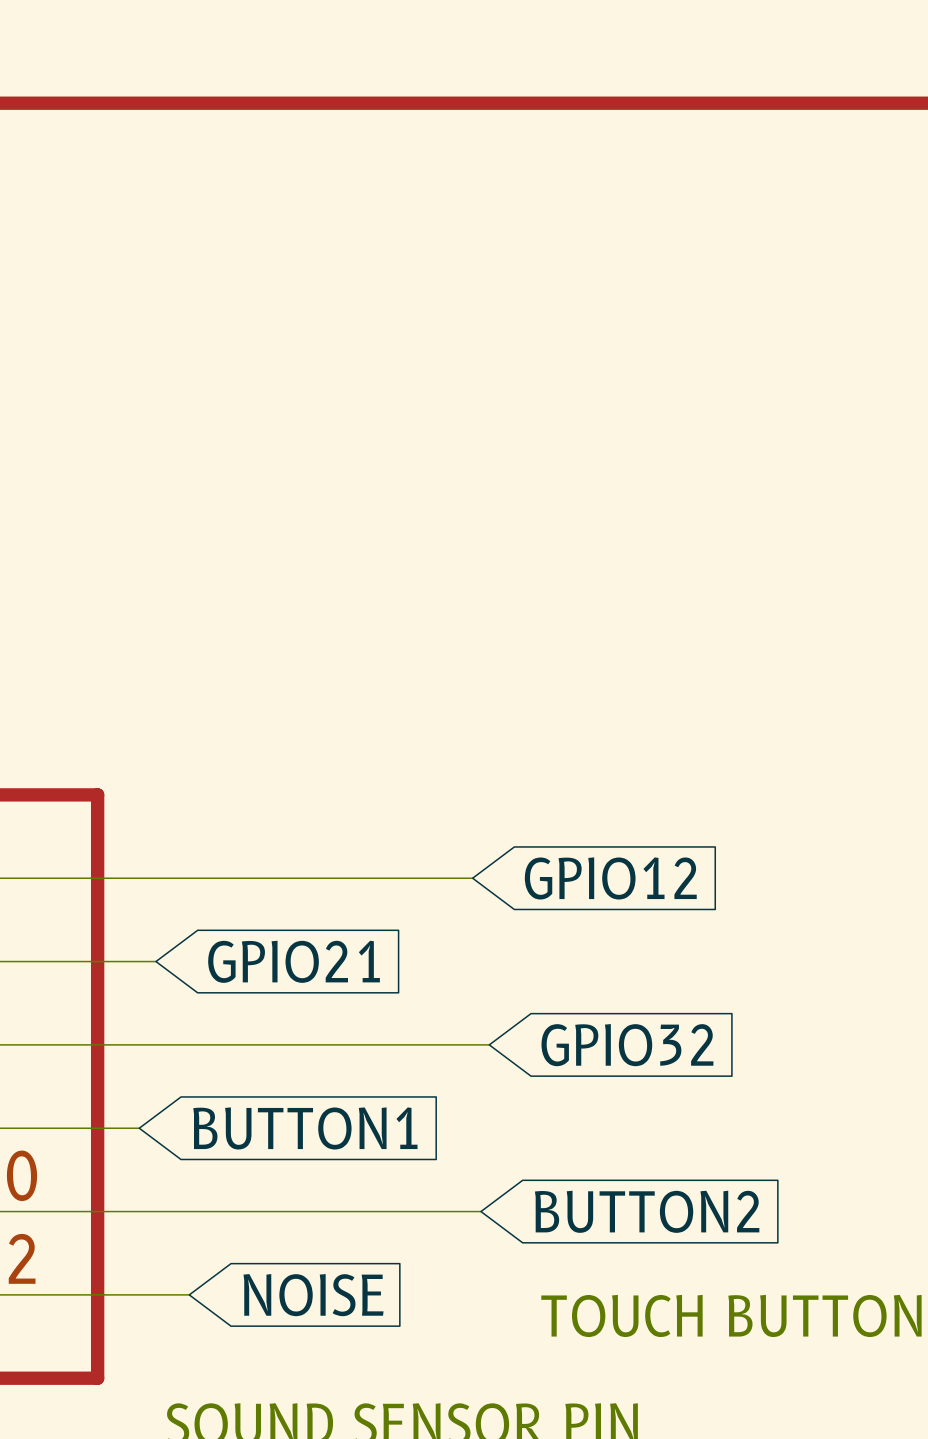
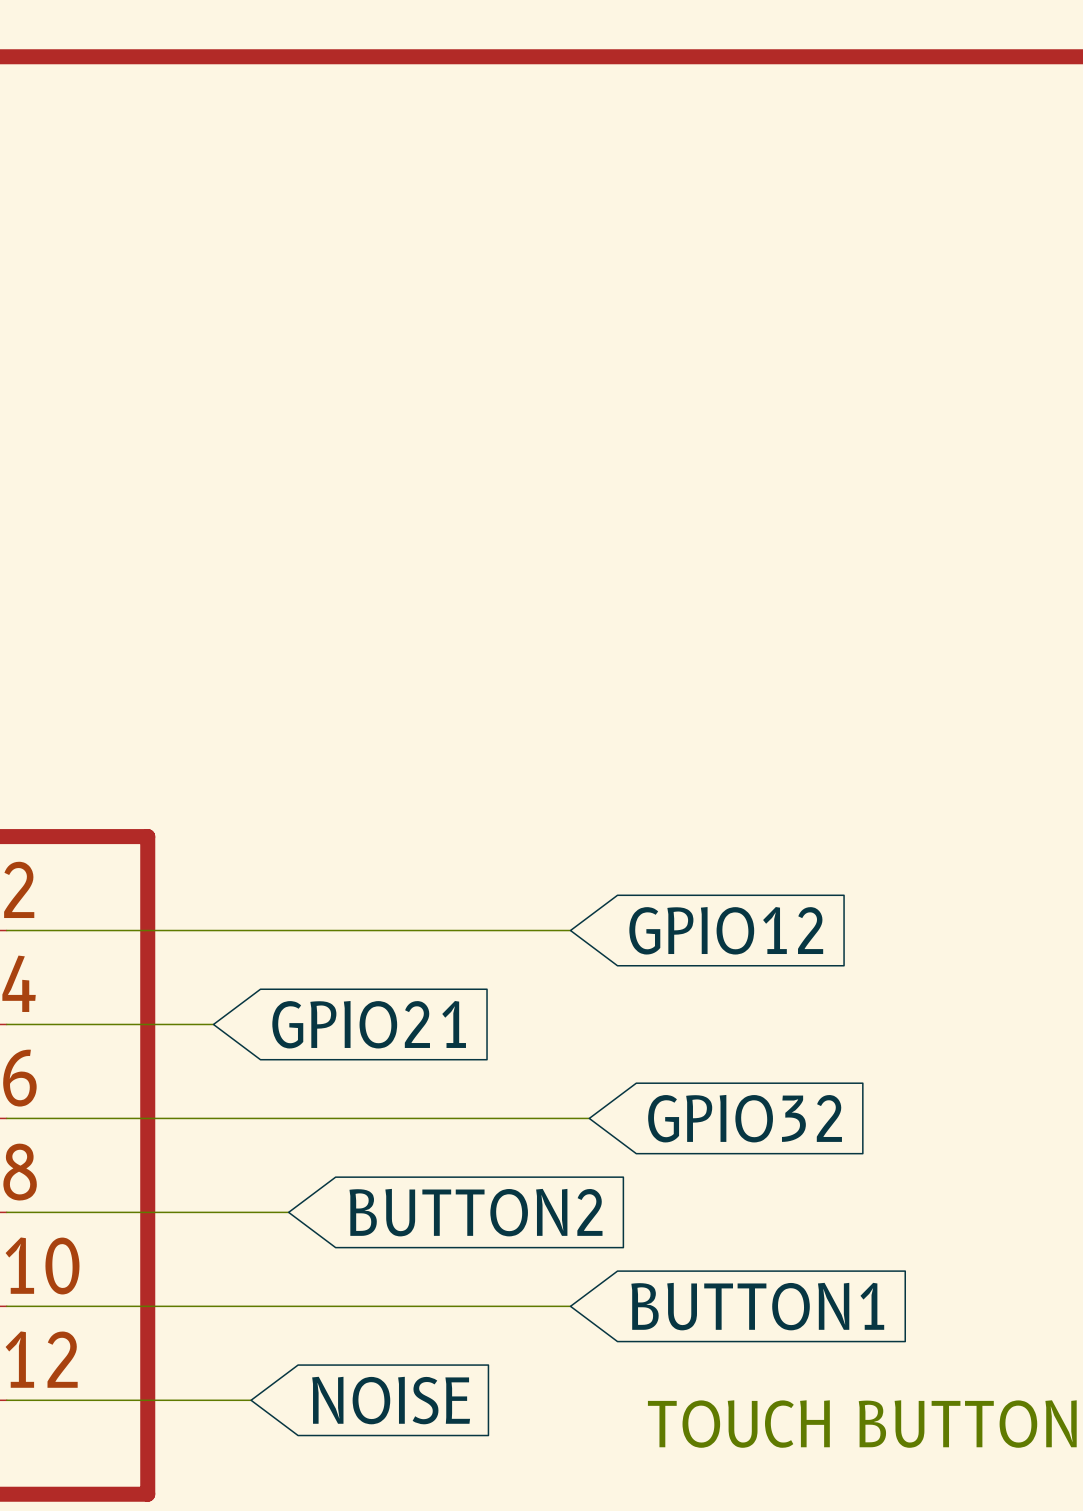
wire: none -> (194, 1212) (288, 1212)
global label: BUTTON1 (305, 1128) -> BUTTON2 (475, 1212)
wire: (472, 1211) (480, 1211) -> none
global label: BUTTON2 (647, 1211) -> BUTTON1 (757, 1306)

